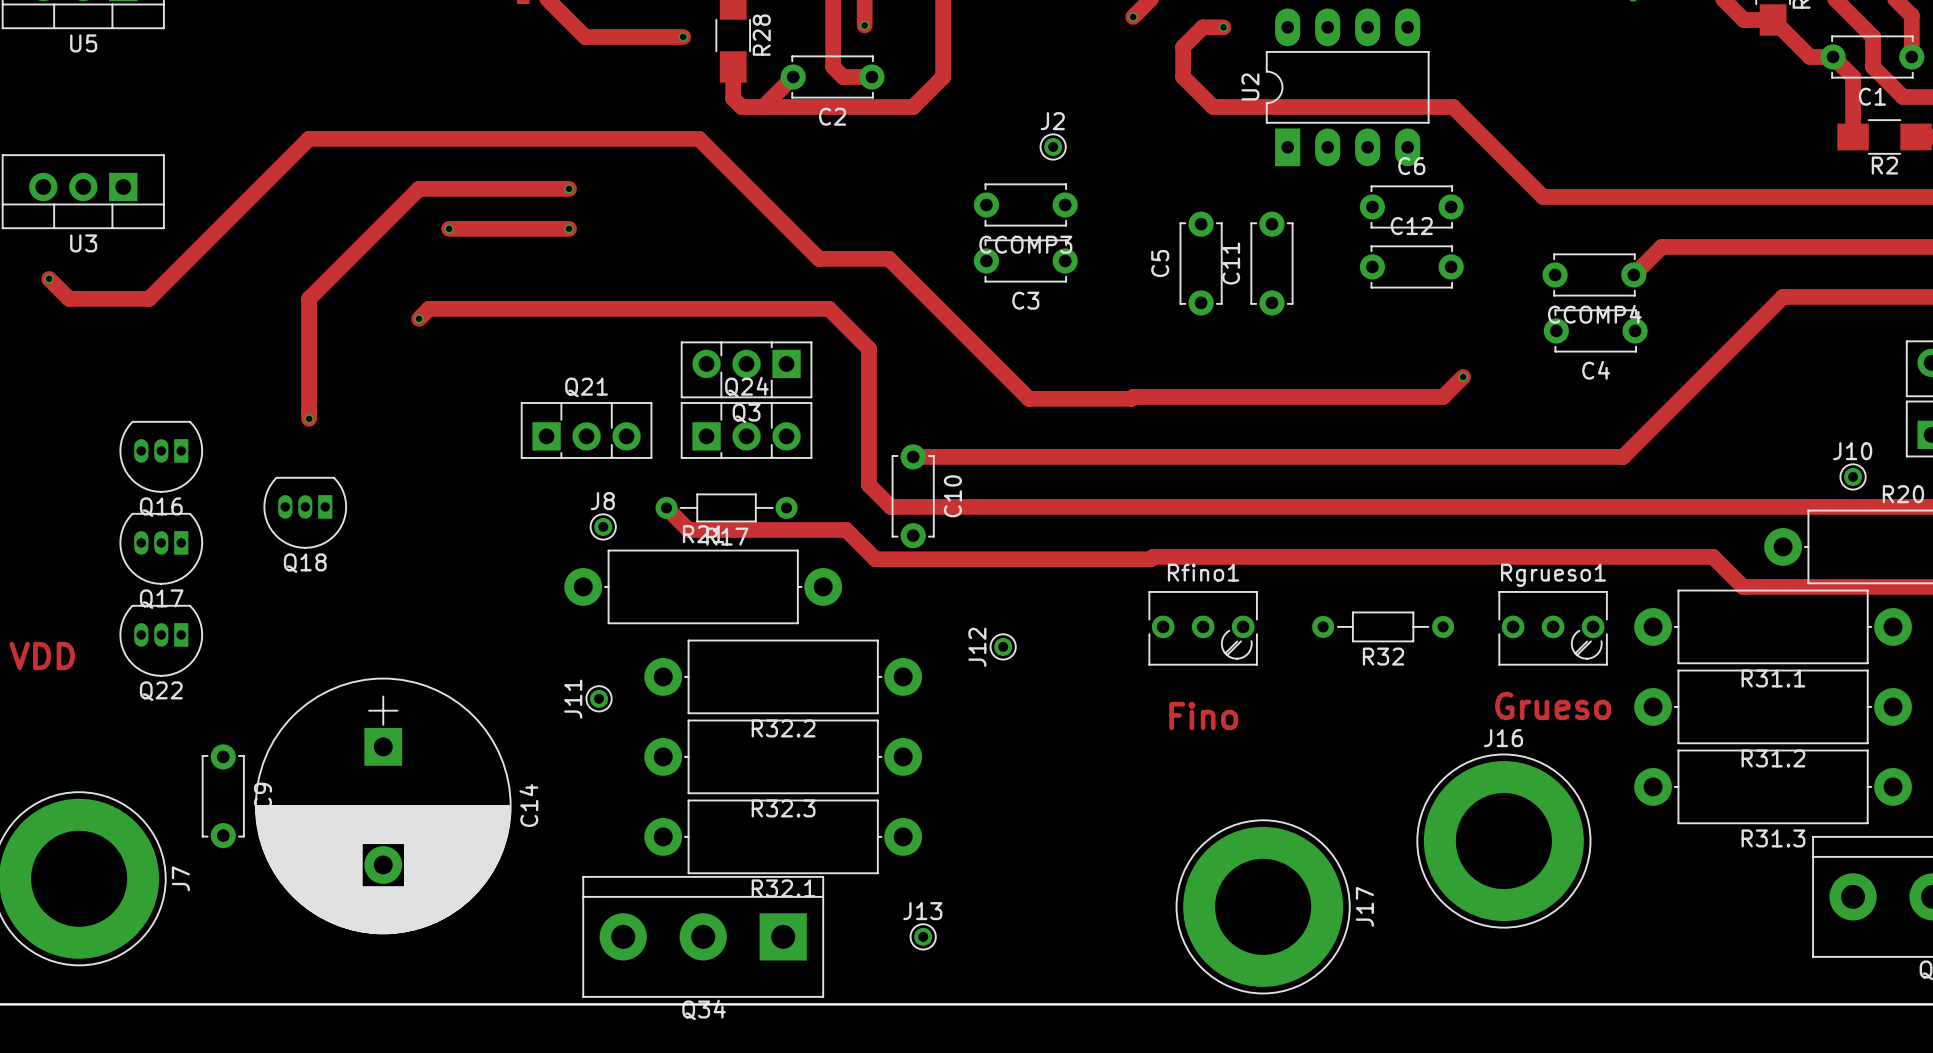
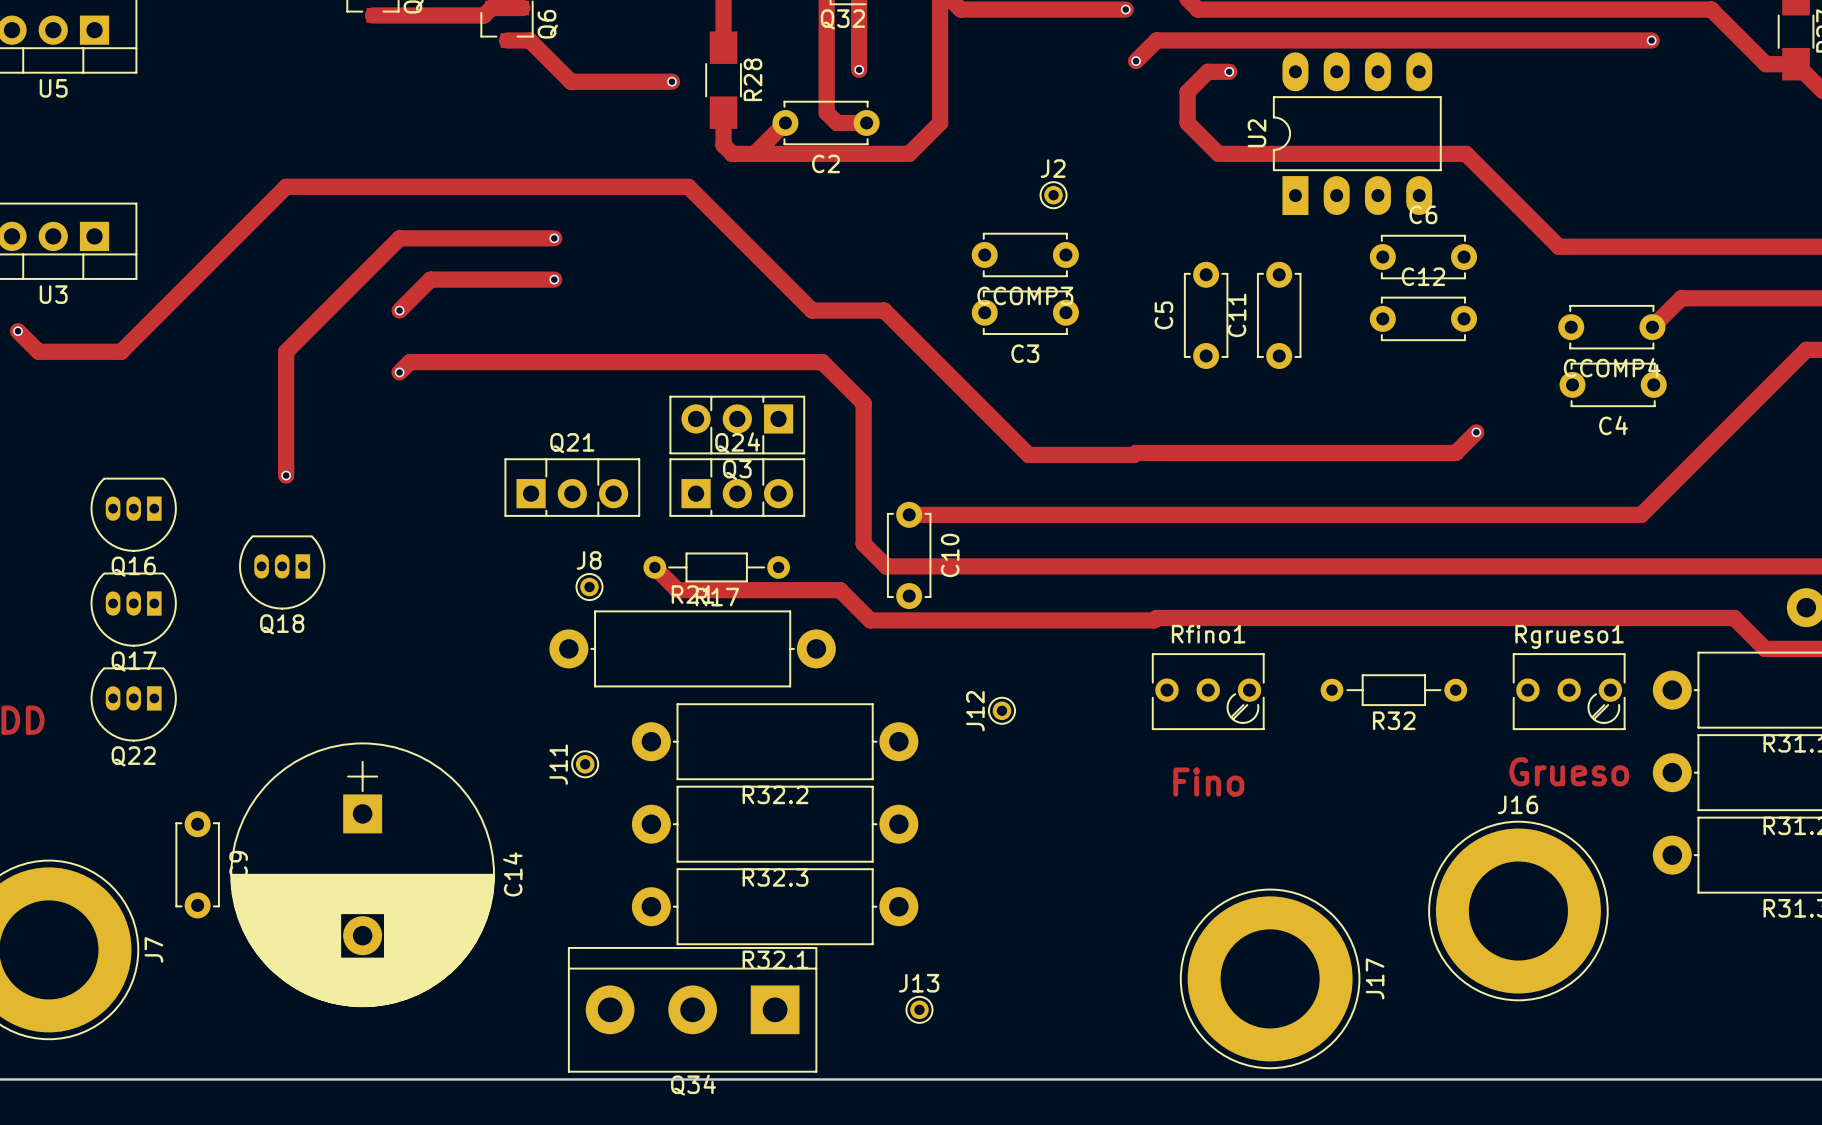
track: none -> (430, 279) (399, 310)
via position: (449, 228) -> (399, 310)

